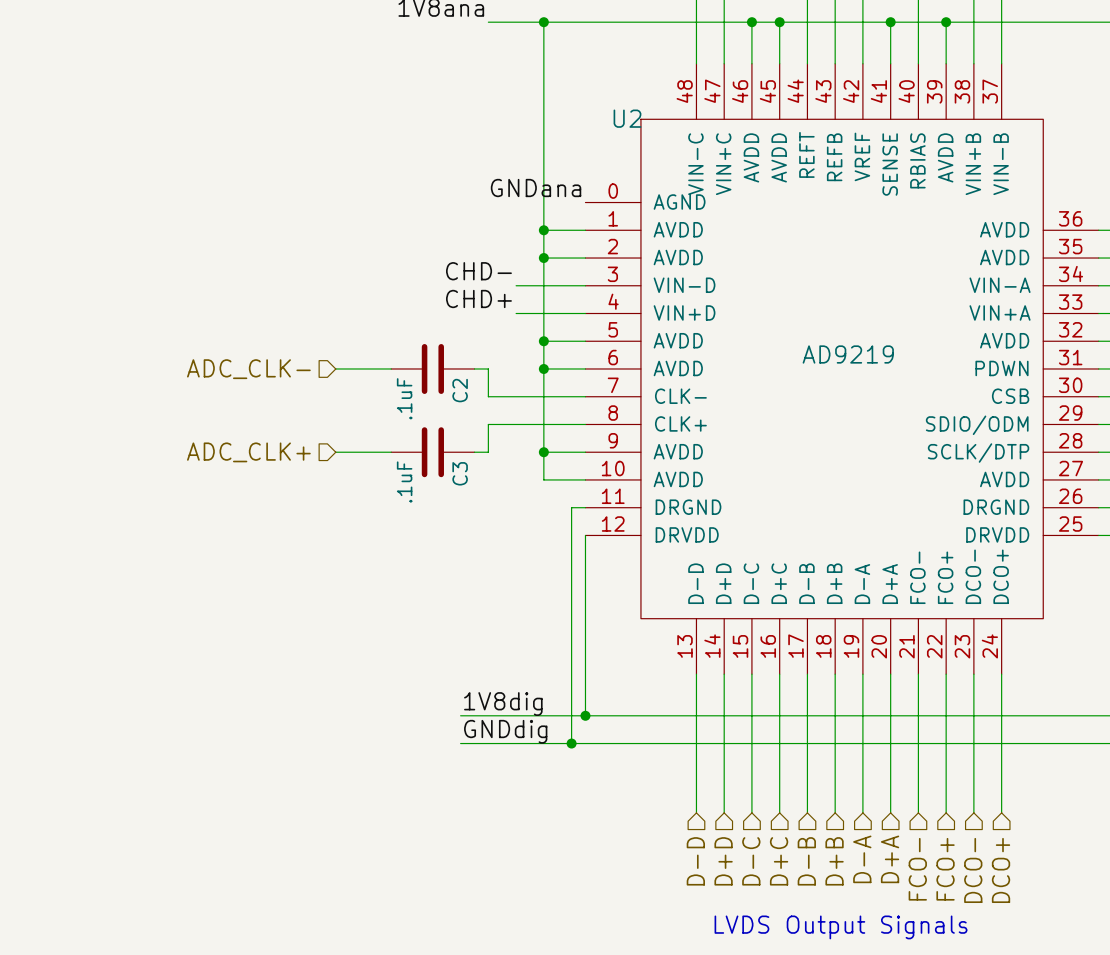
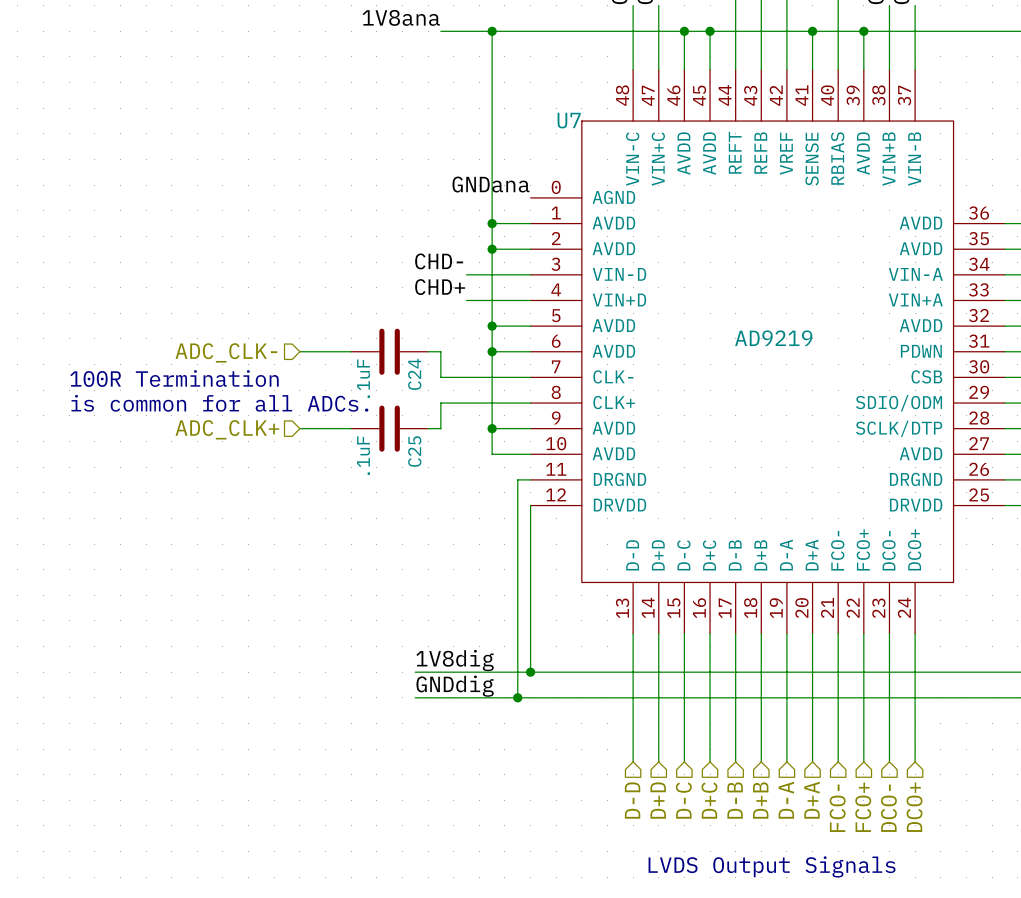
U2 name: U2 (627, 118) -> U7 (569, 120)
C2 name: C2 (460, 390) -> C24 (414, 374)
text: none -> 100R Termination (174, 378)
text: none -> is common for all ADCs. (219, 403)
C3 name: C3 (460, 473) -> C25 (414, 451)

